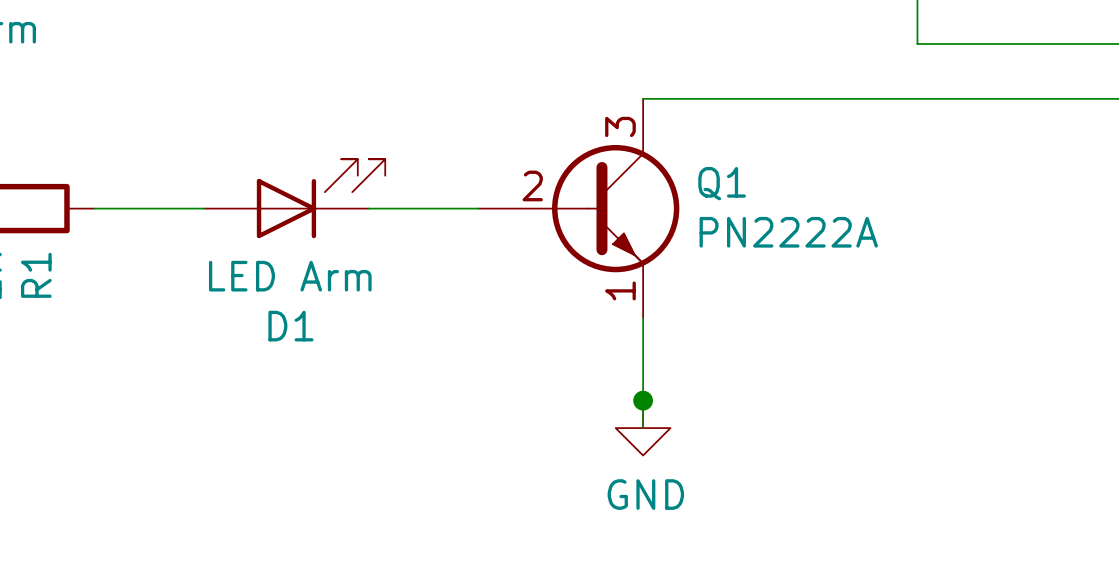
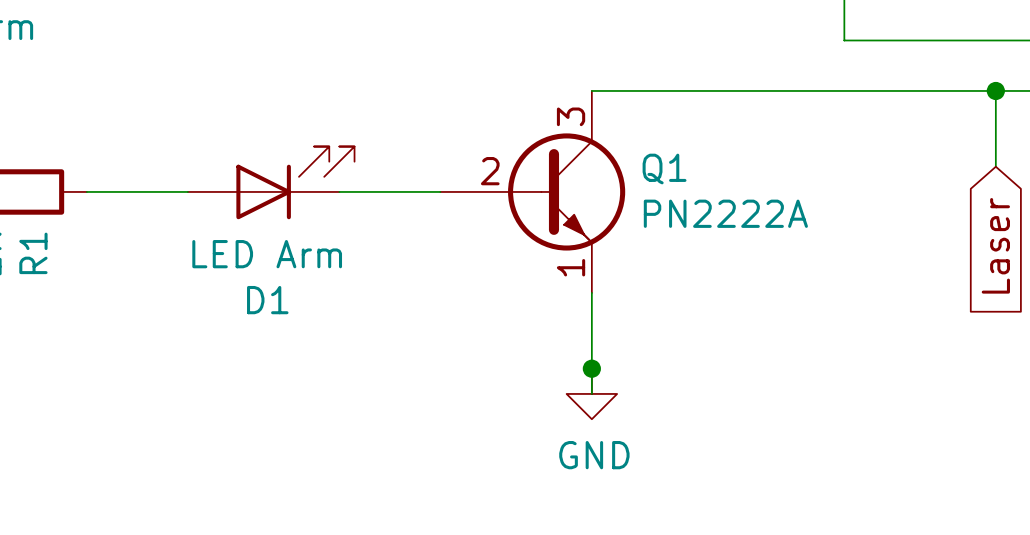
wire: none -> (995, 90) (995, 166)
junction: none -> (995, 90)
global label: none -> Laser (995, 245)

